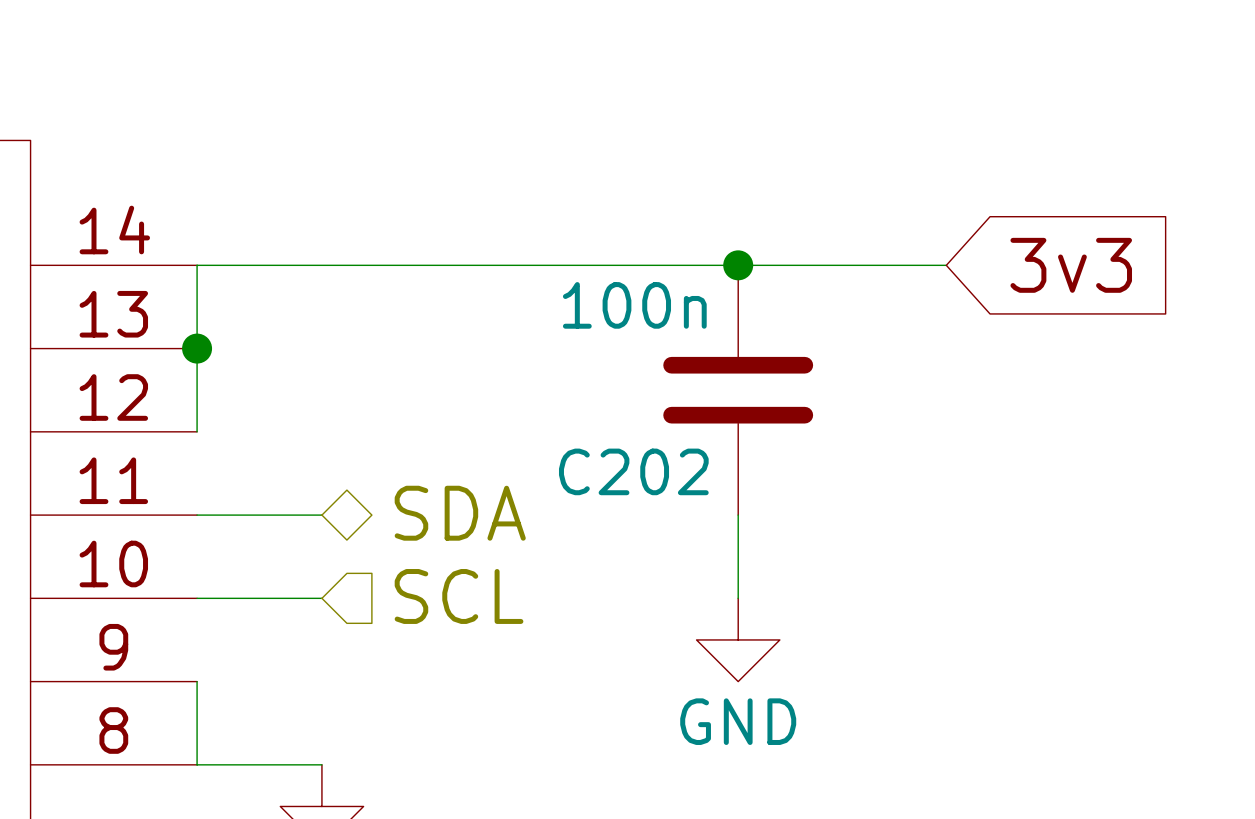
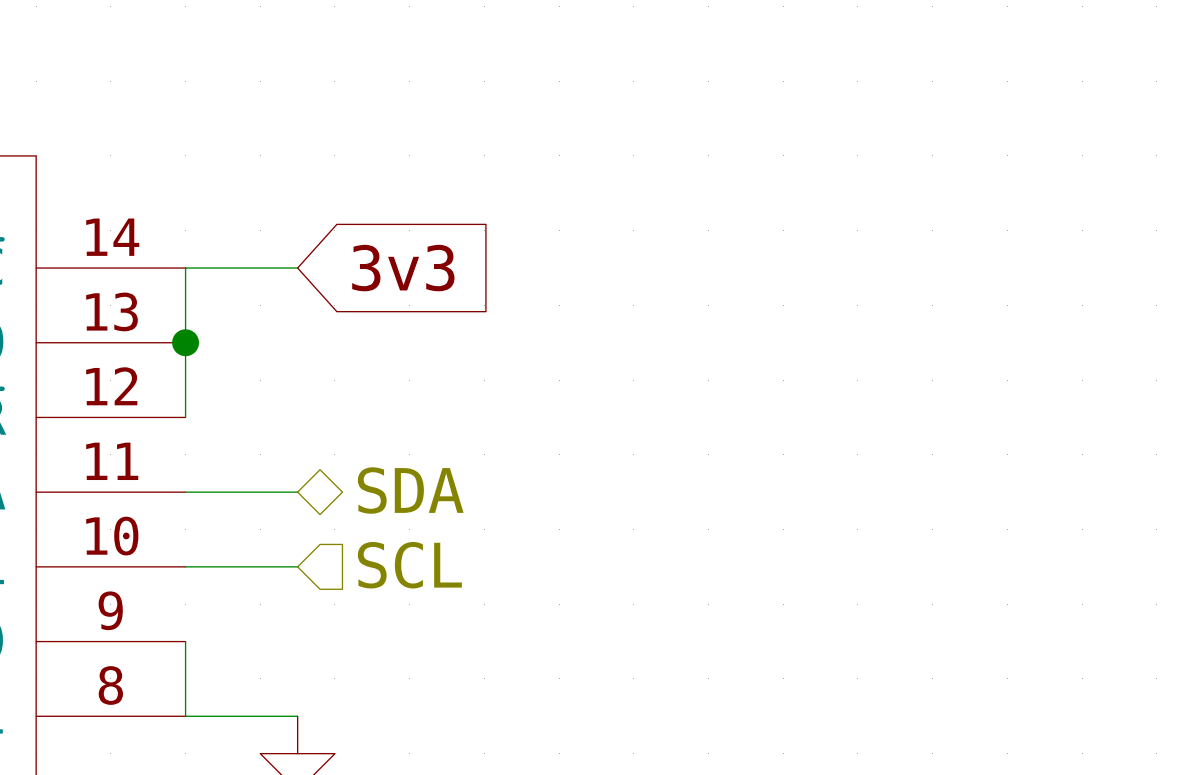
wire: (321, 265) (946, 265) -> none
junction: (738, 265) -> none
global label position: 3v3 (1071, 265) -> 3v3 (403, 268)
C202: 100n (738, 390) -> none
wire: (738, 515) (738, 598) -> none
power symbol: GND (738, 639) -> none

